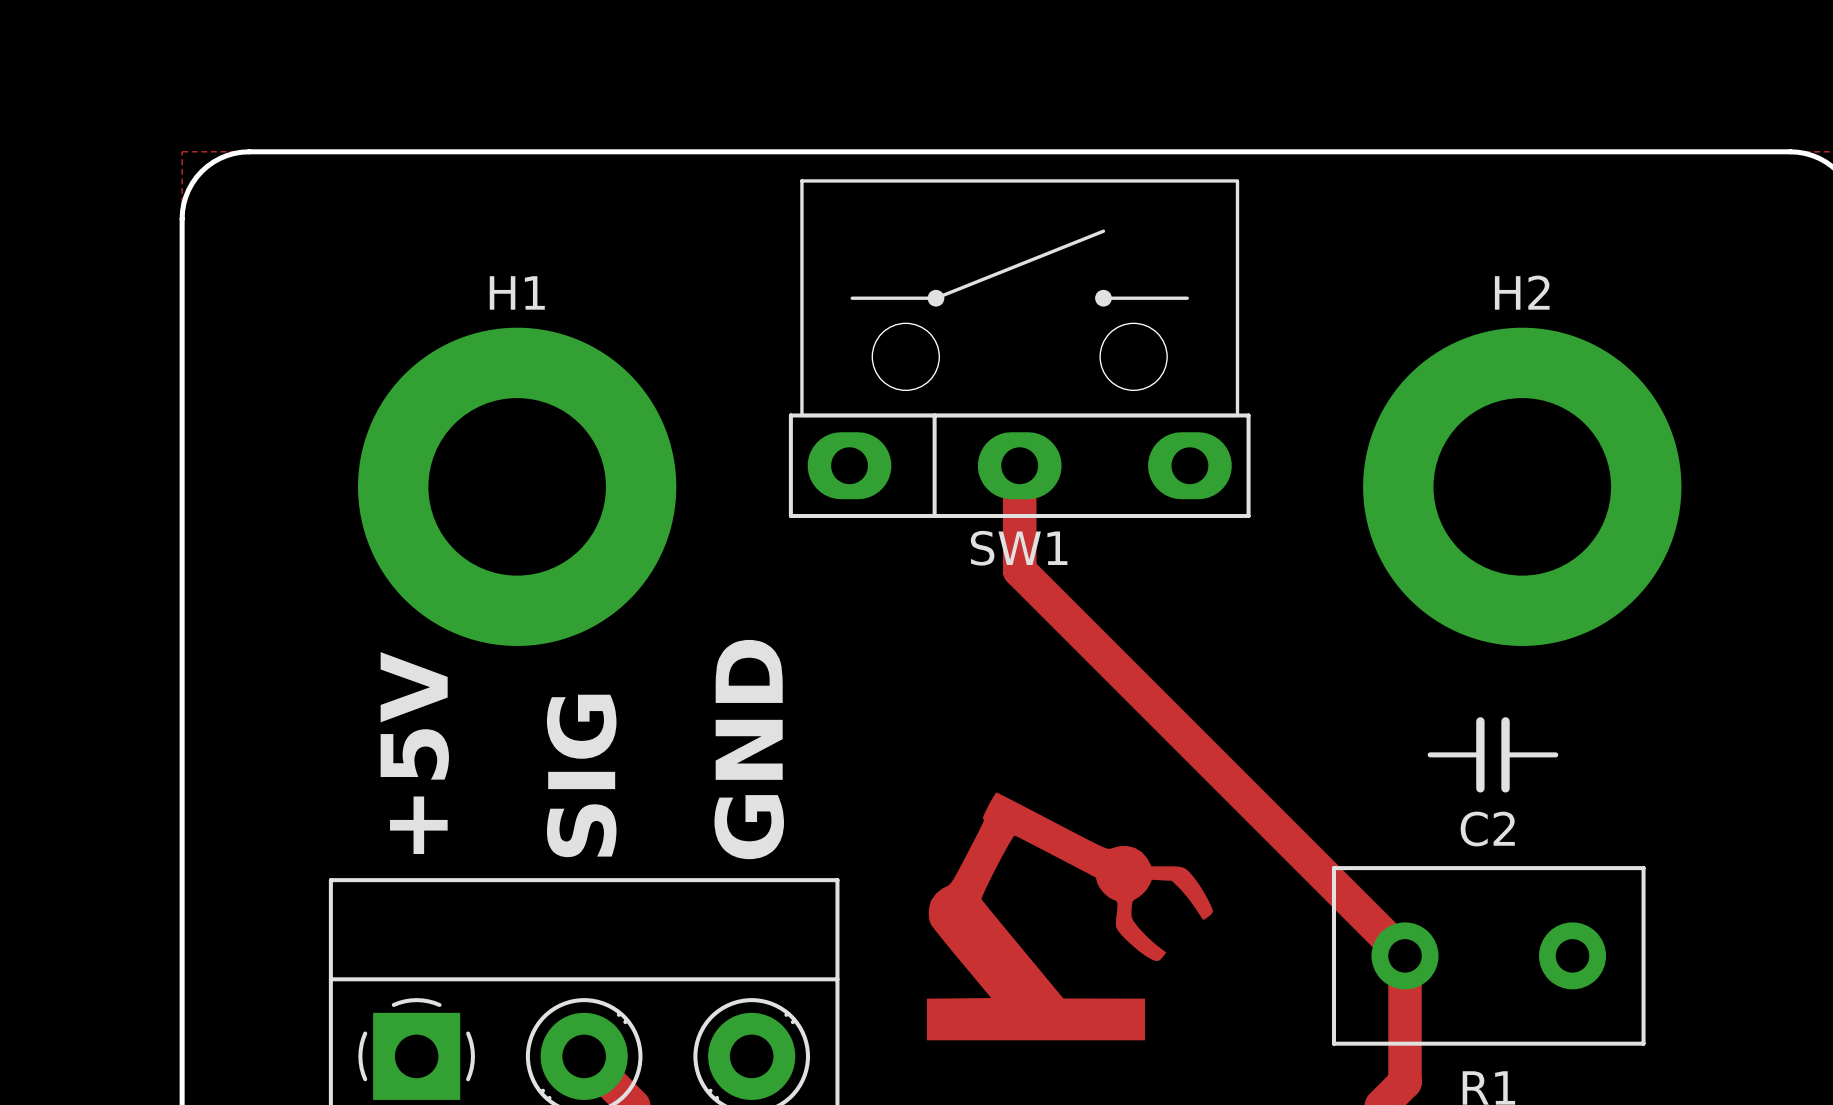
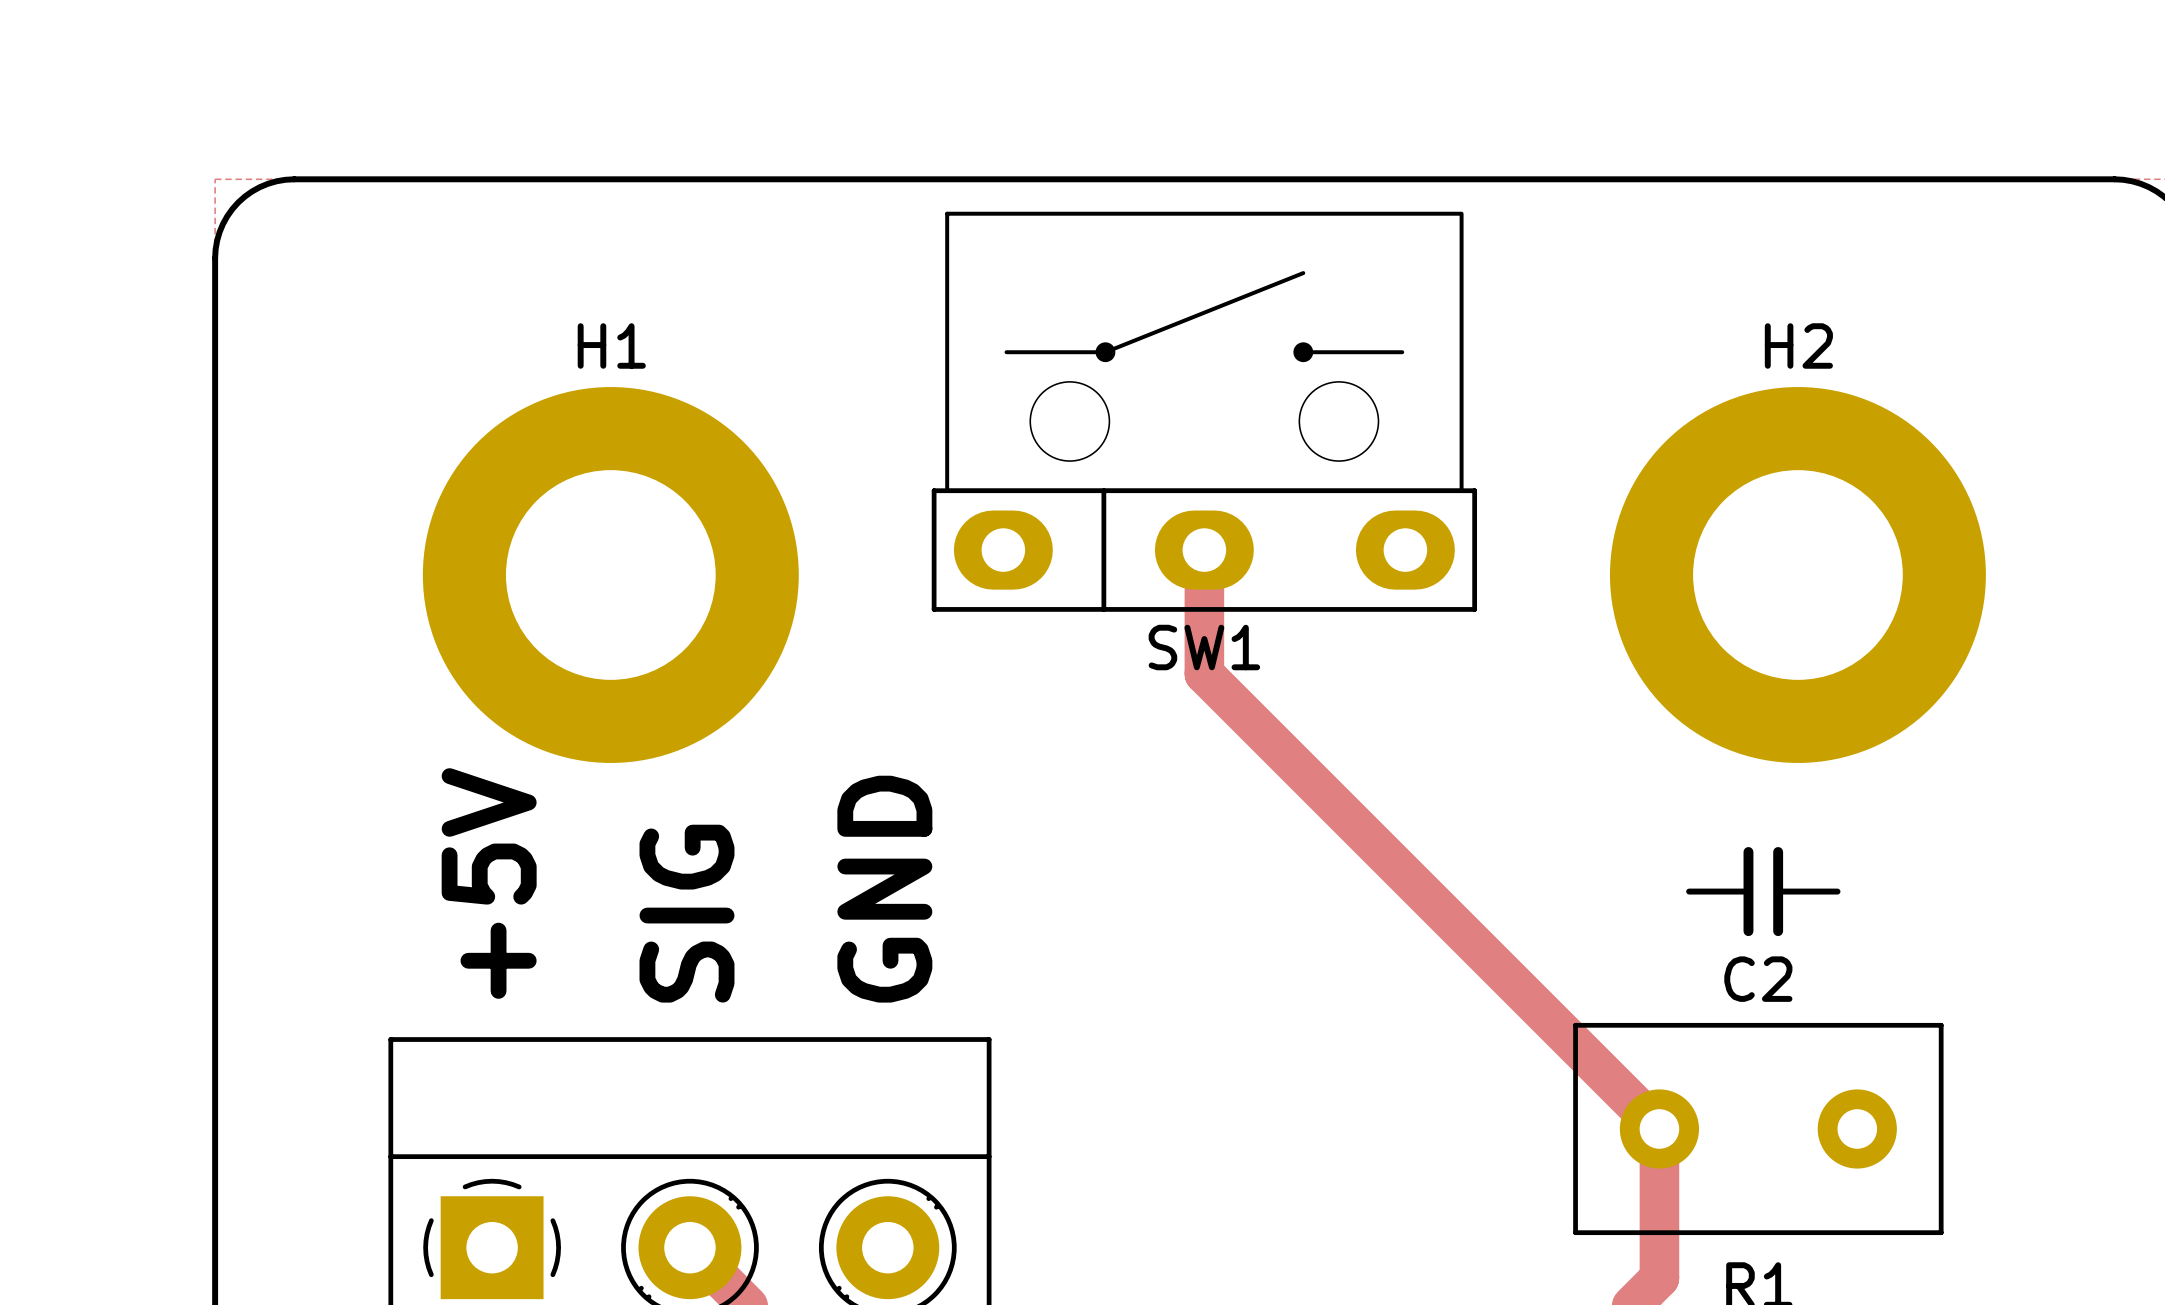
drawing: [926, 792, 1213, 1041] -> none

